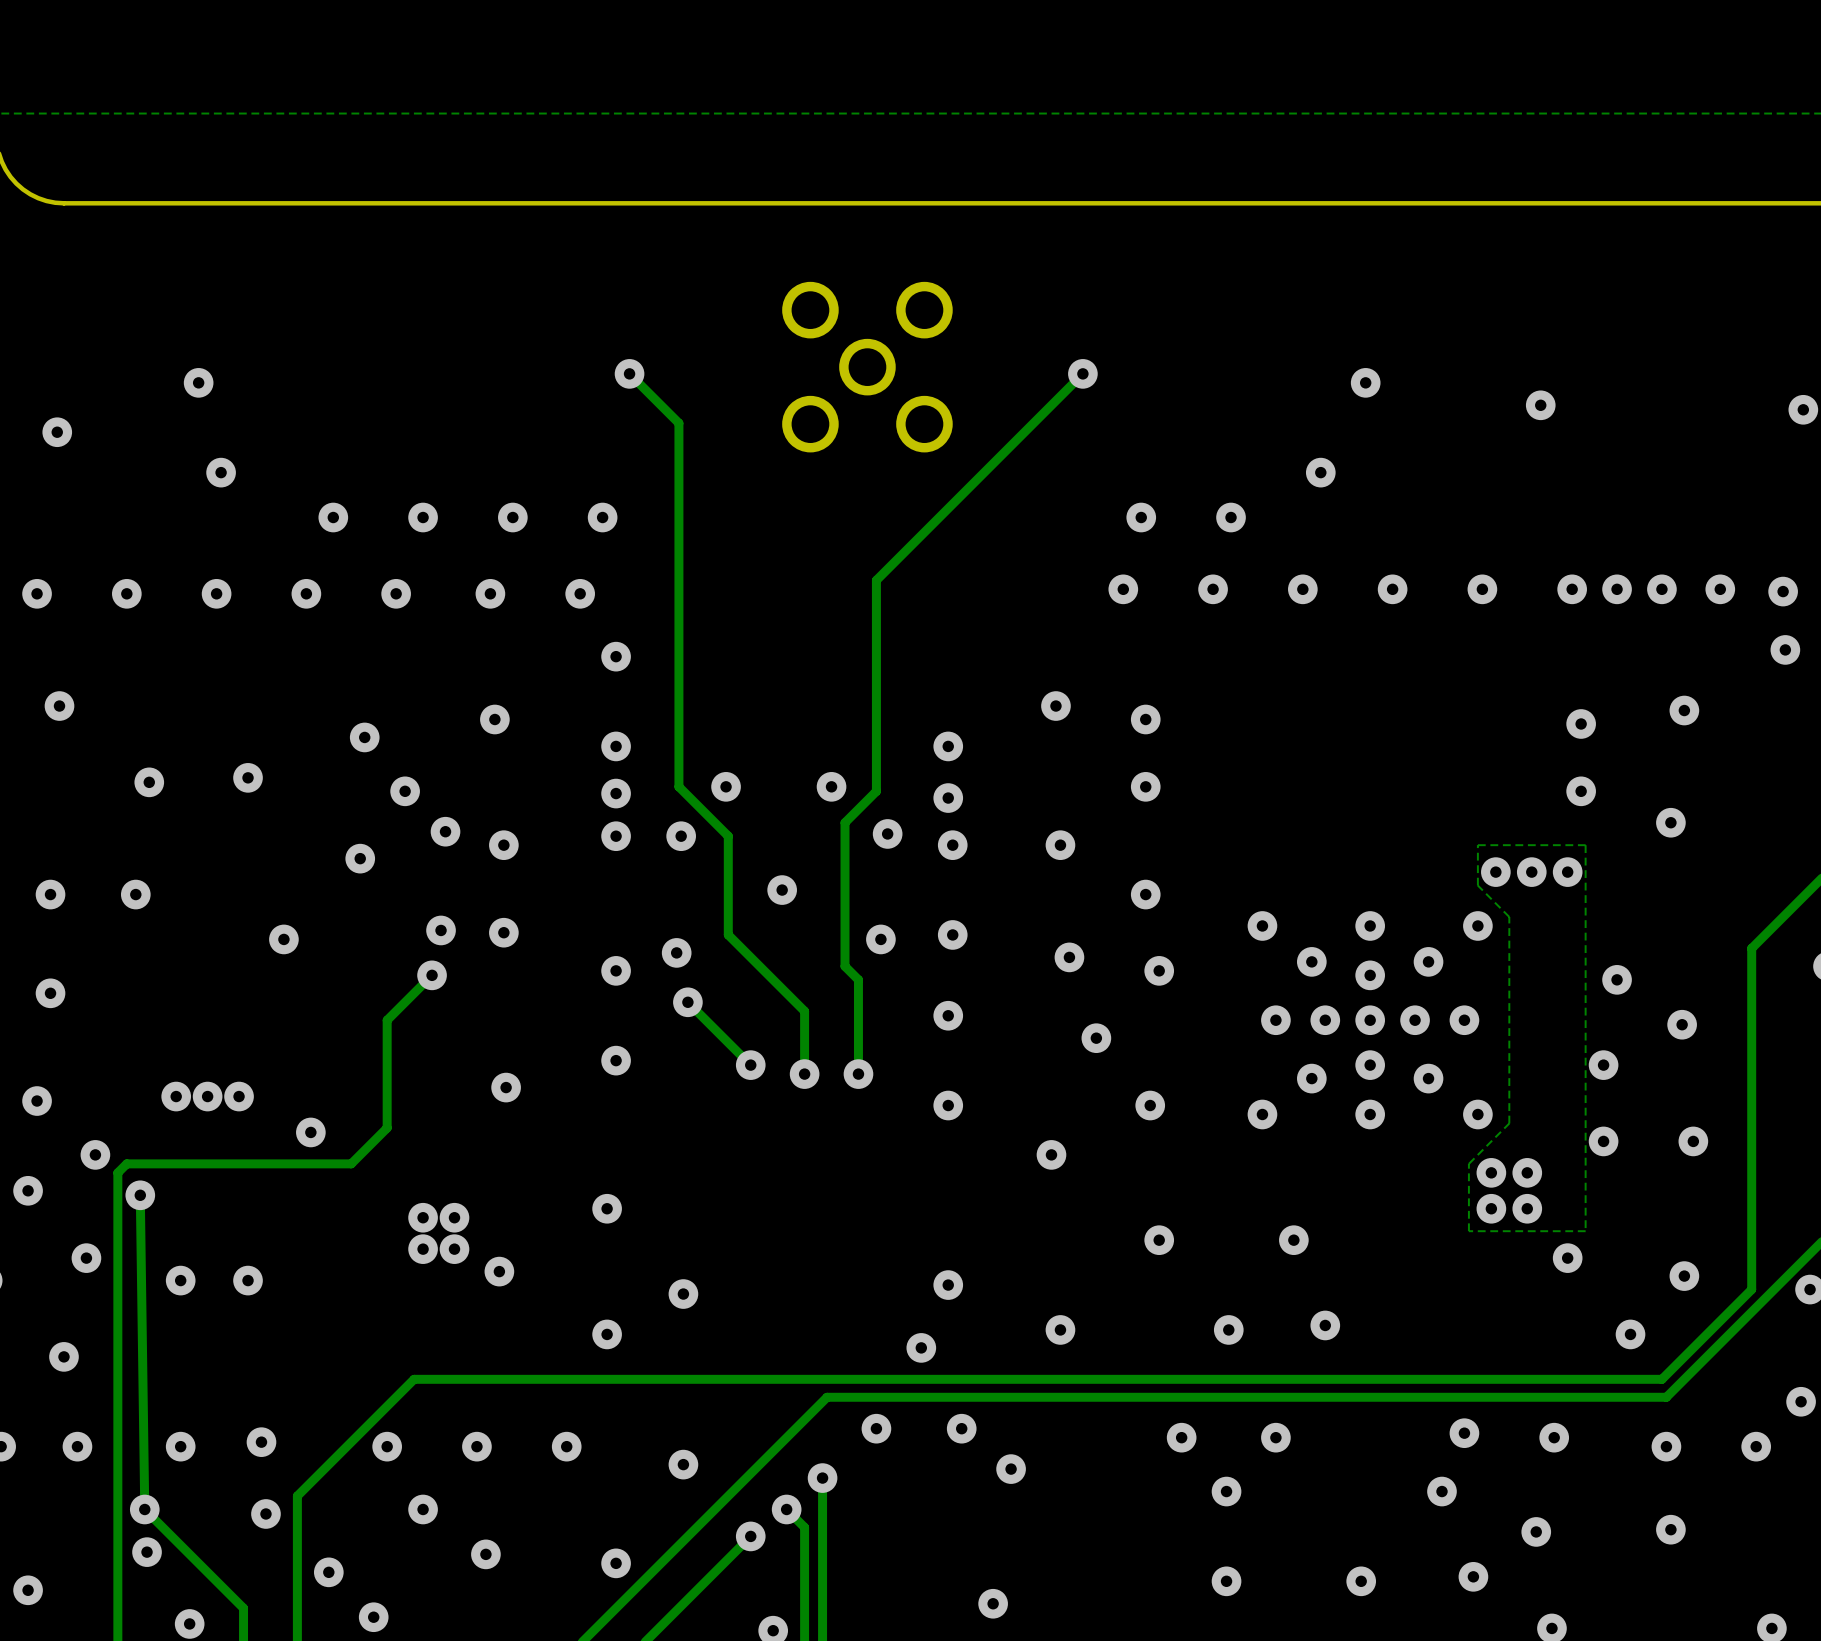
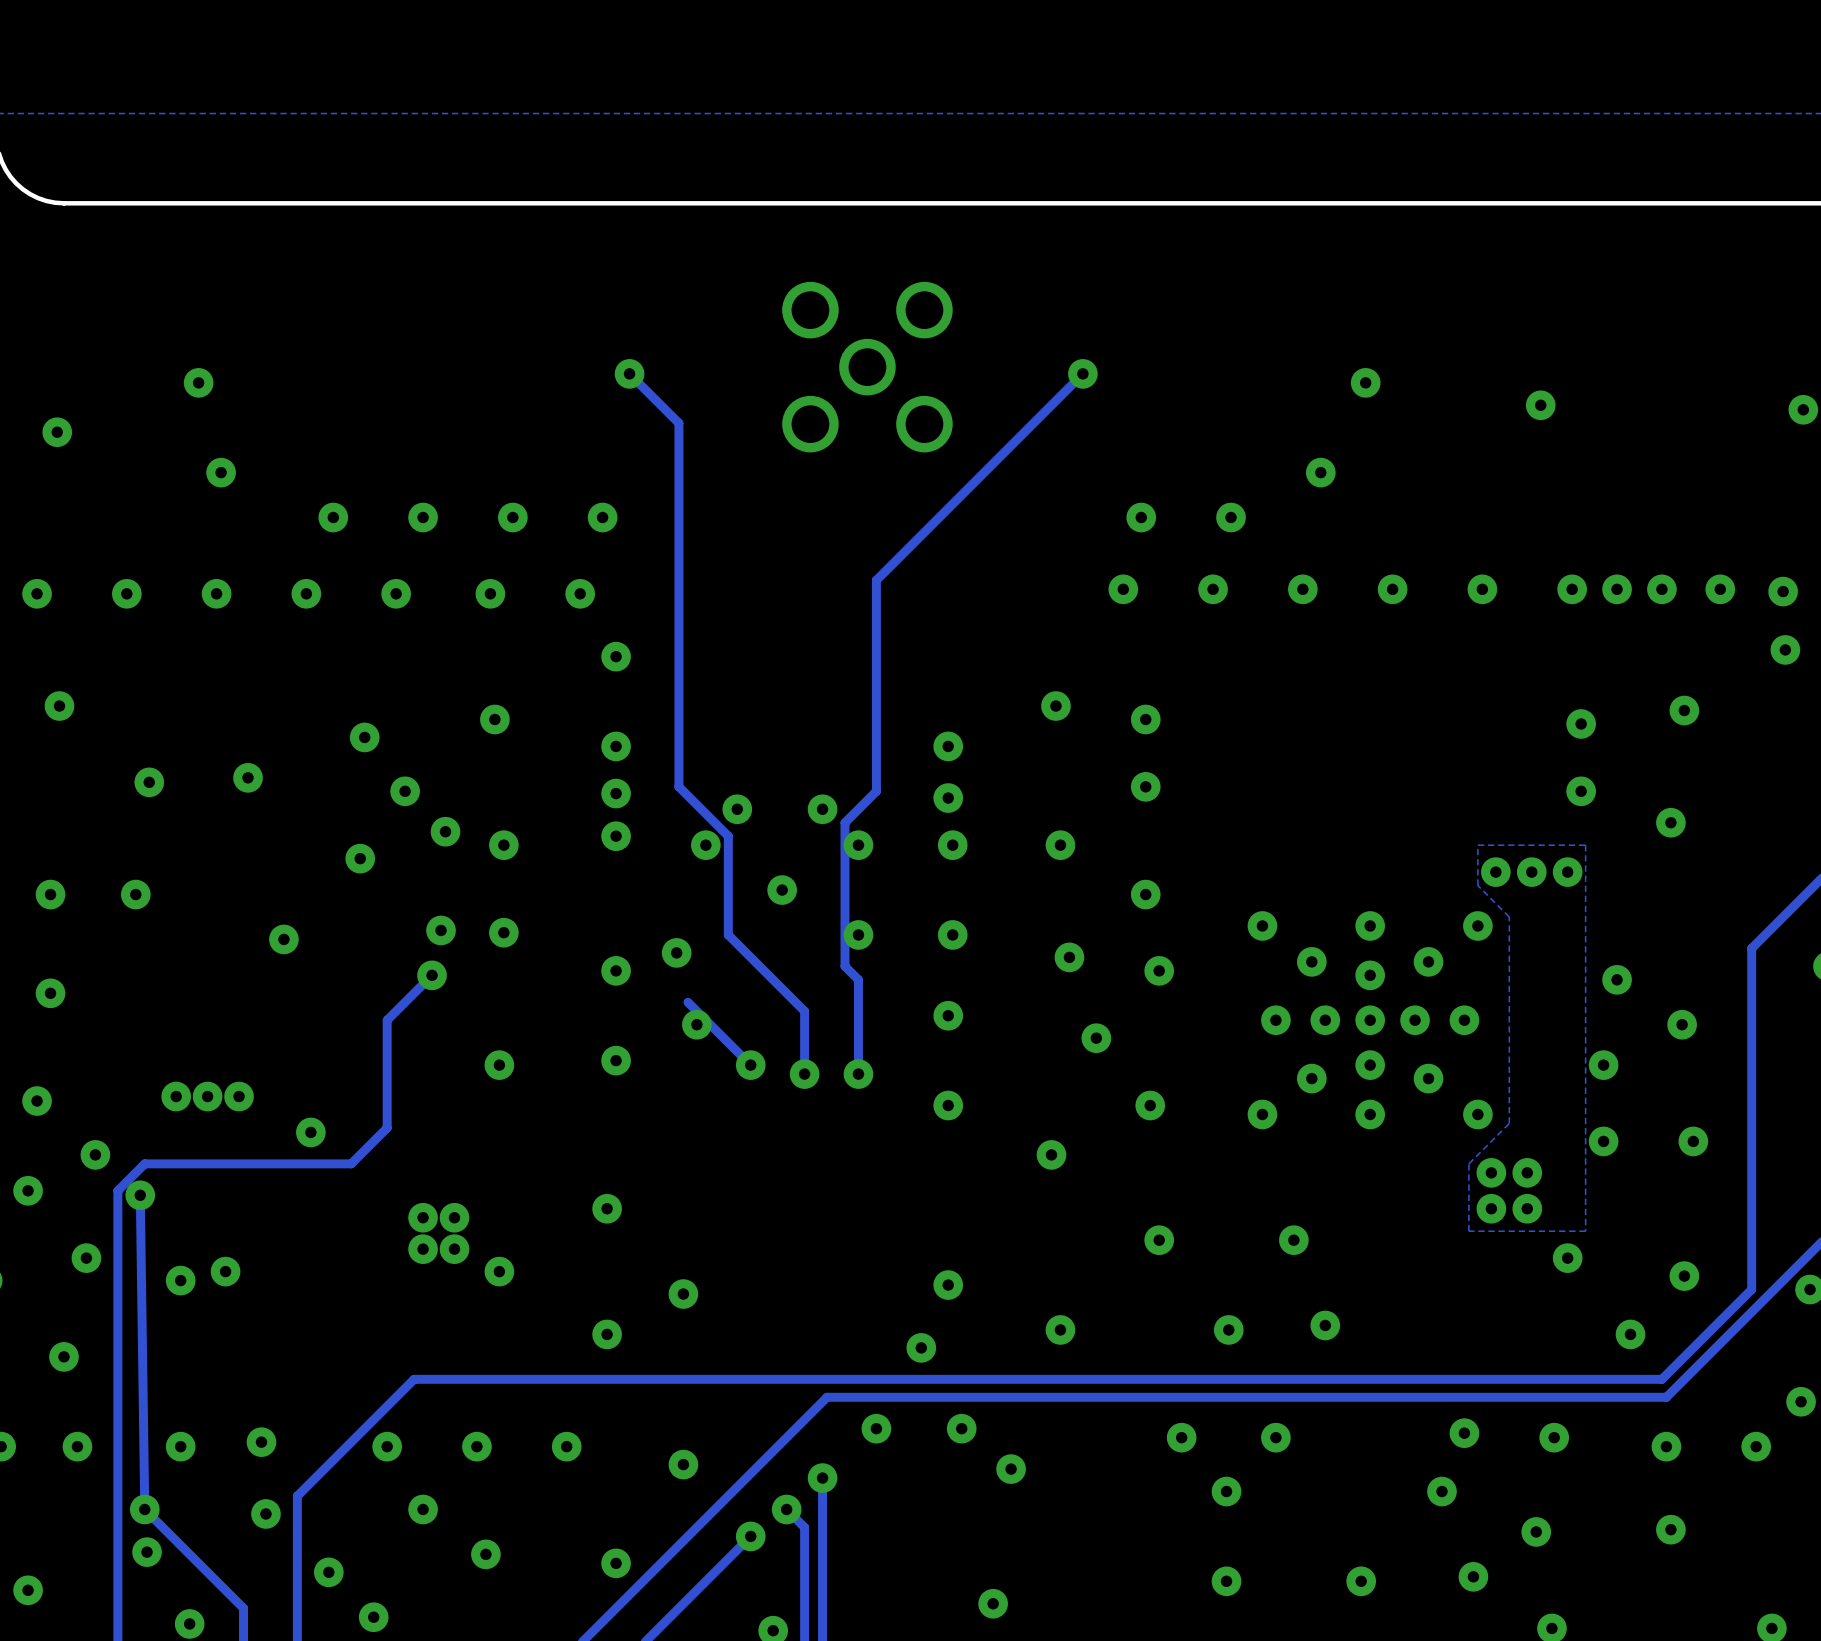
via position: (726, 786) -> (737, 809)
via position: (831, 786) -> (822, 809)
via position: (887, 833) -> (858, 845)
via position: (681, 836) -> (705, 845)
via position: (880, 939) -> (858, 934)
via position: (687, 1002) -> (696, 1024)
via position: (506, 1087) -> (499, 1065)
track: (144, 1163) (126, 1163) (117, 1172) (117, 1190) -> (144, 1163) (117, 1190)
via position: (248, 1280) -> (225, 1271)

